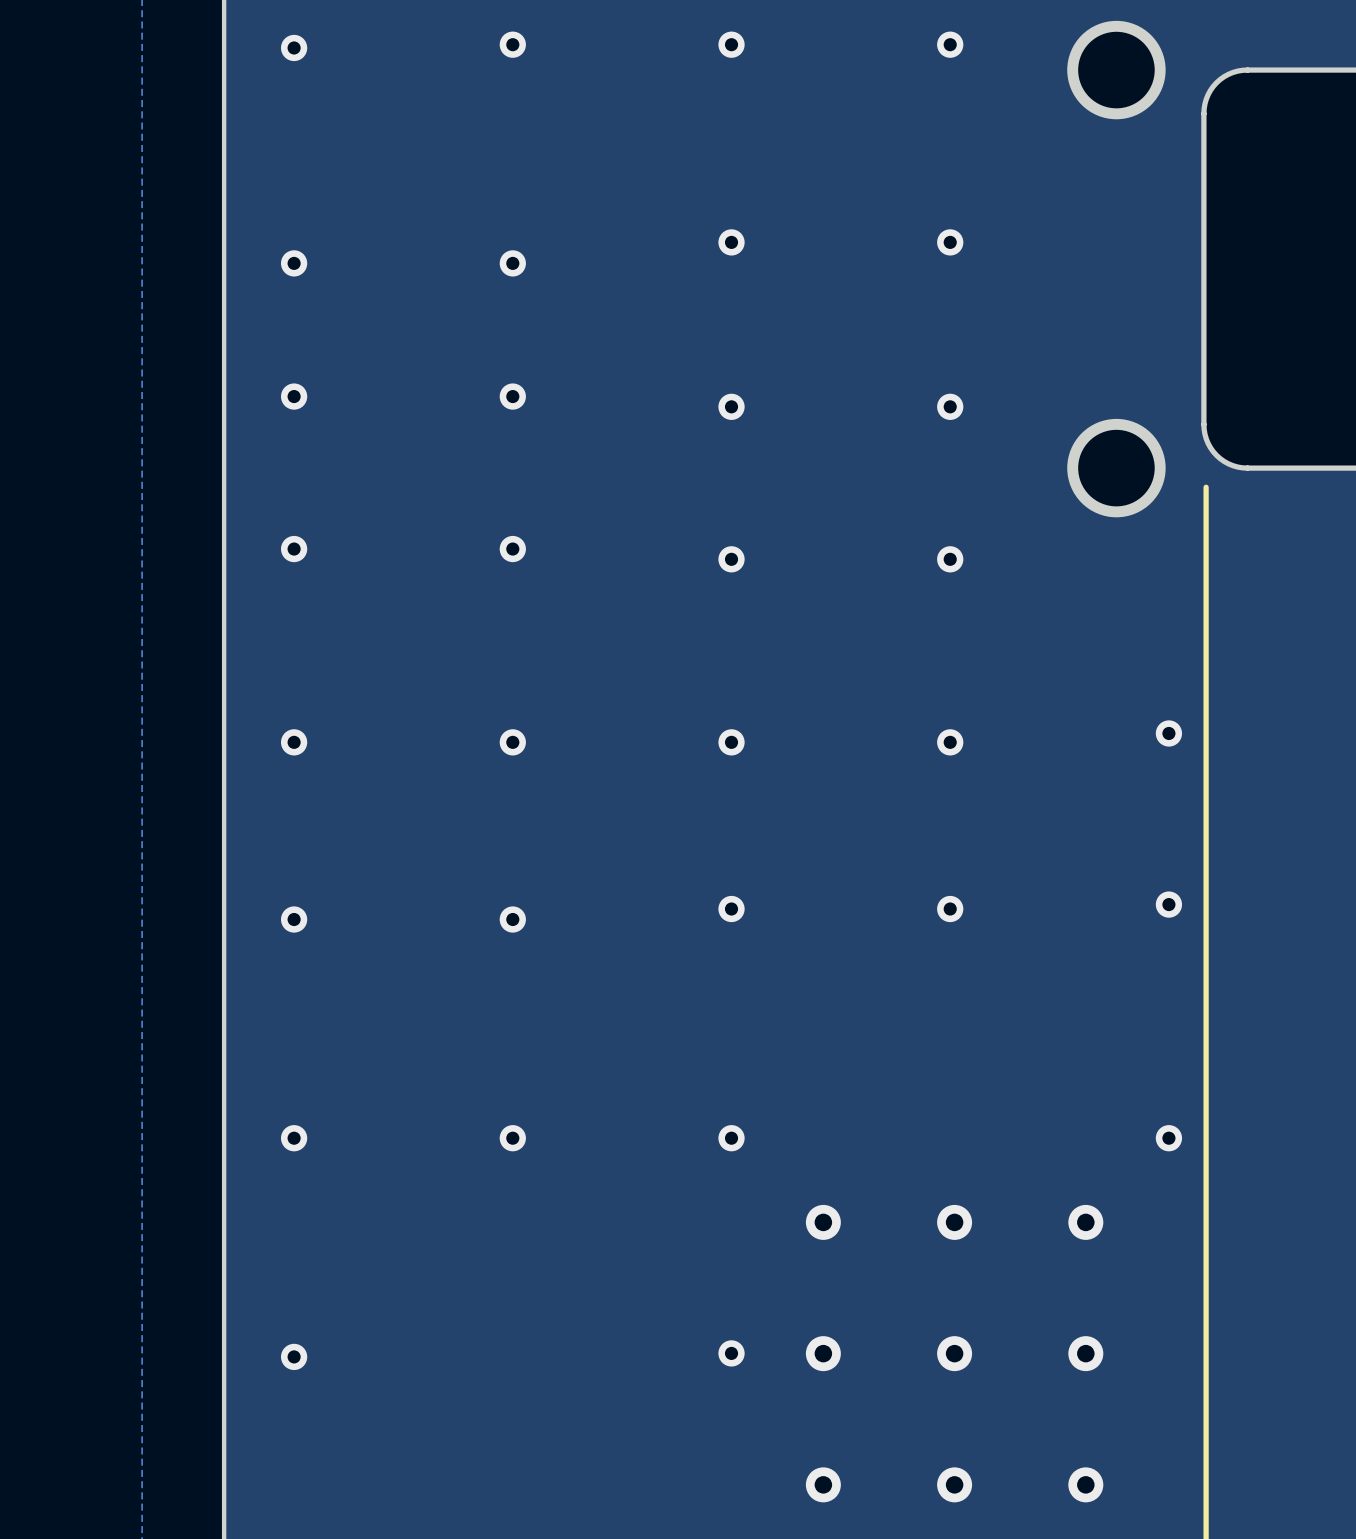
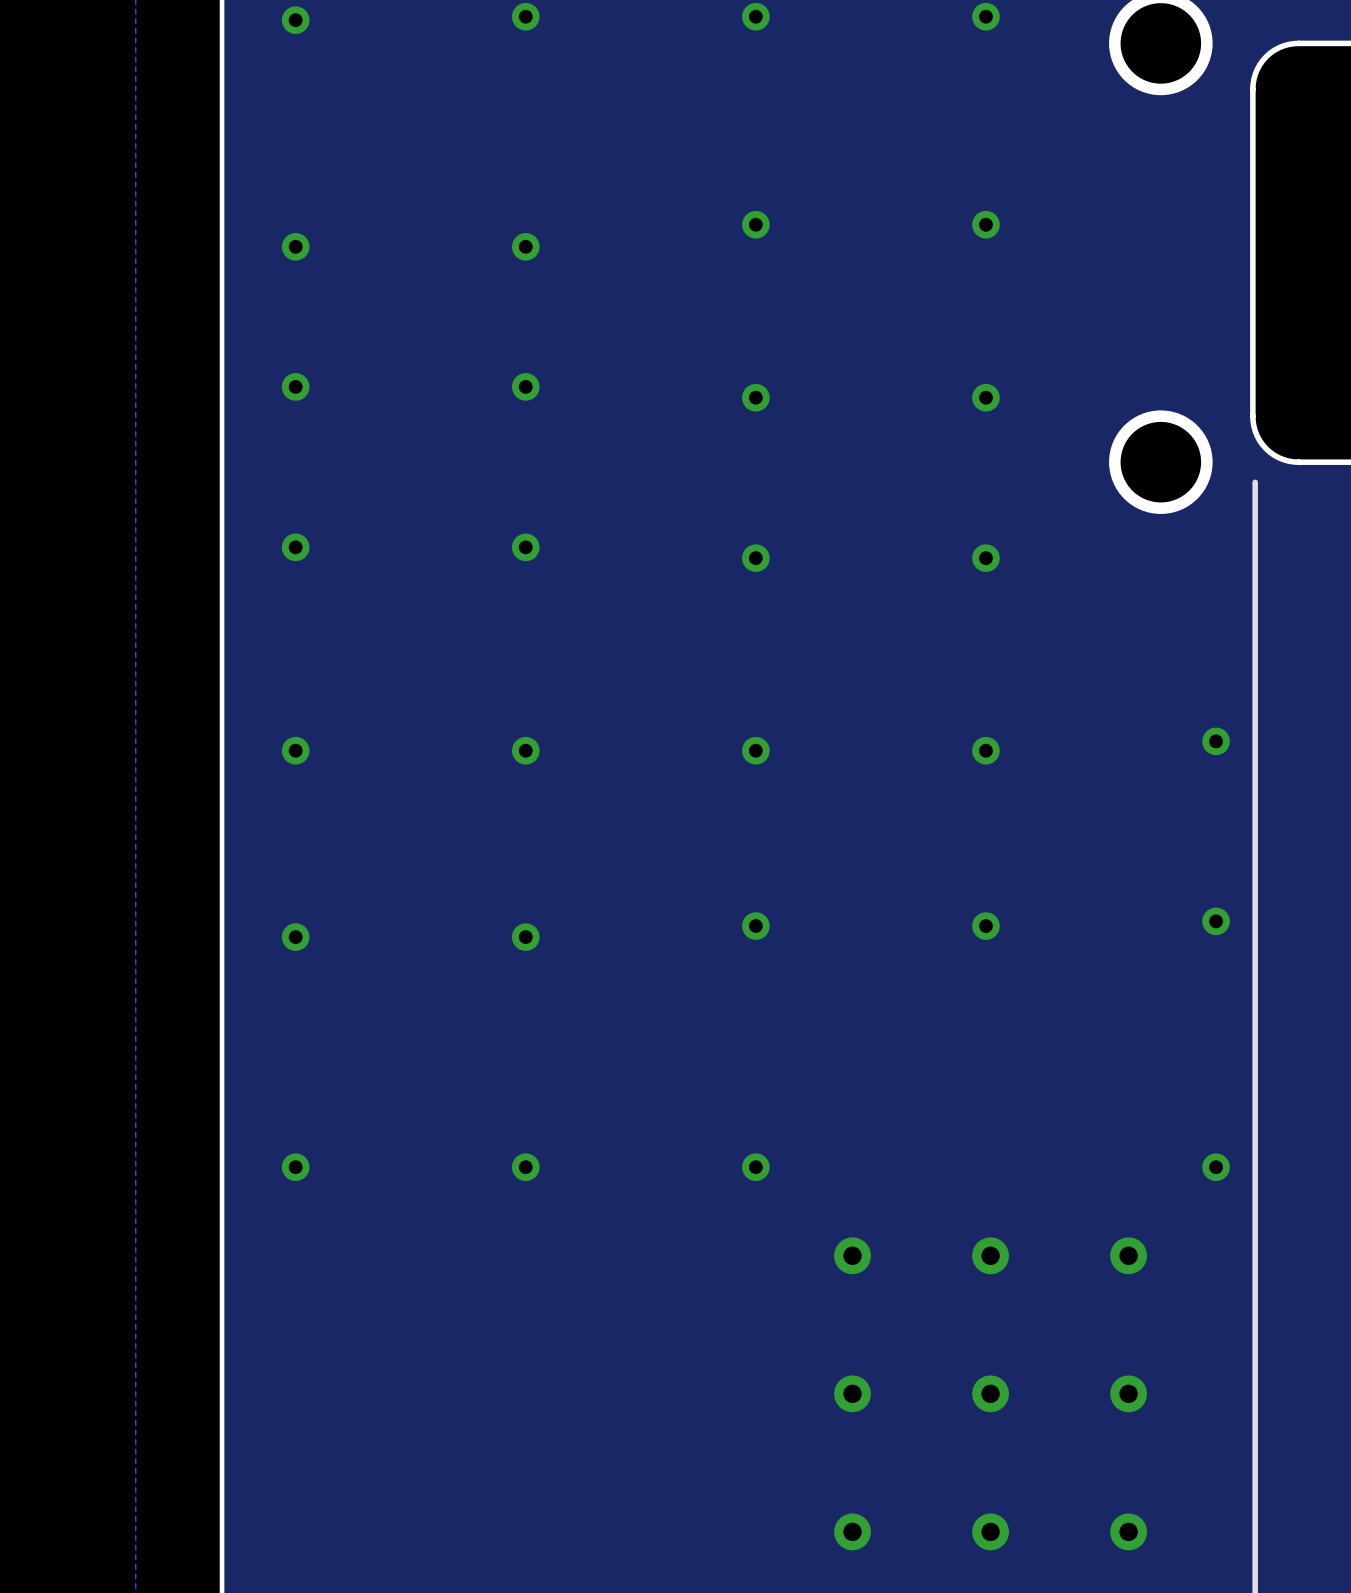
via: (731, 1353) -> none
via: (294, 1356) -> none

